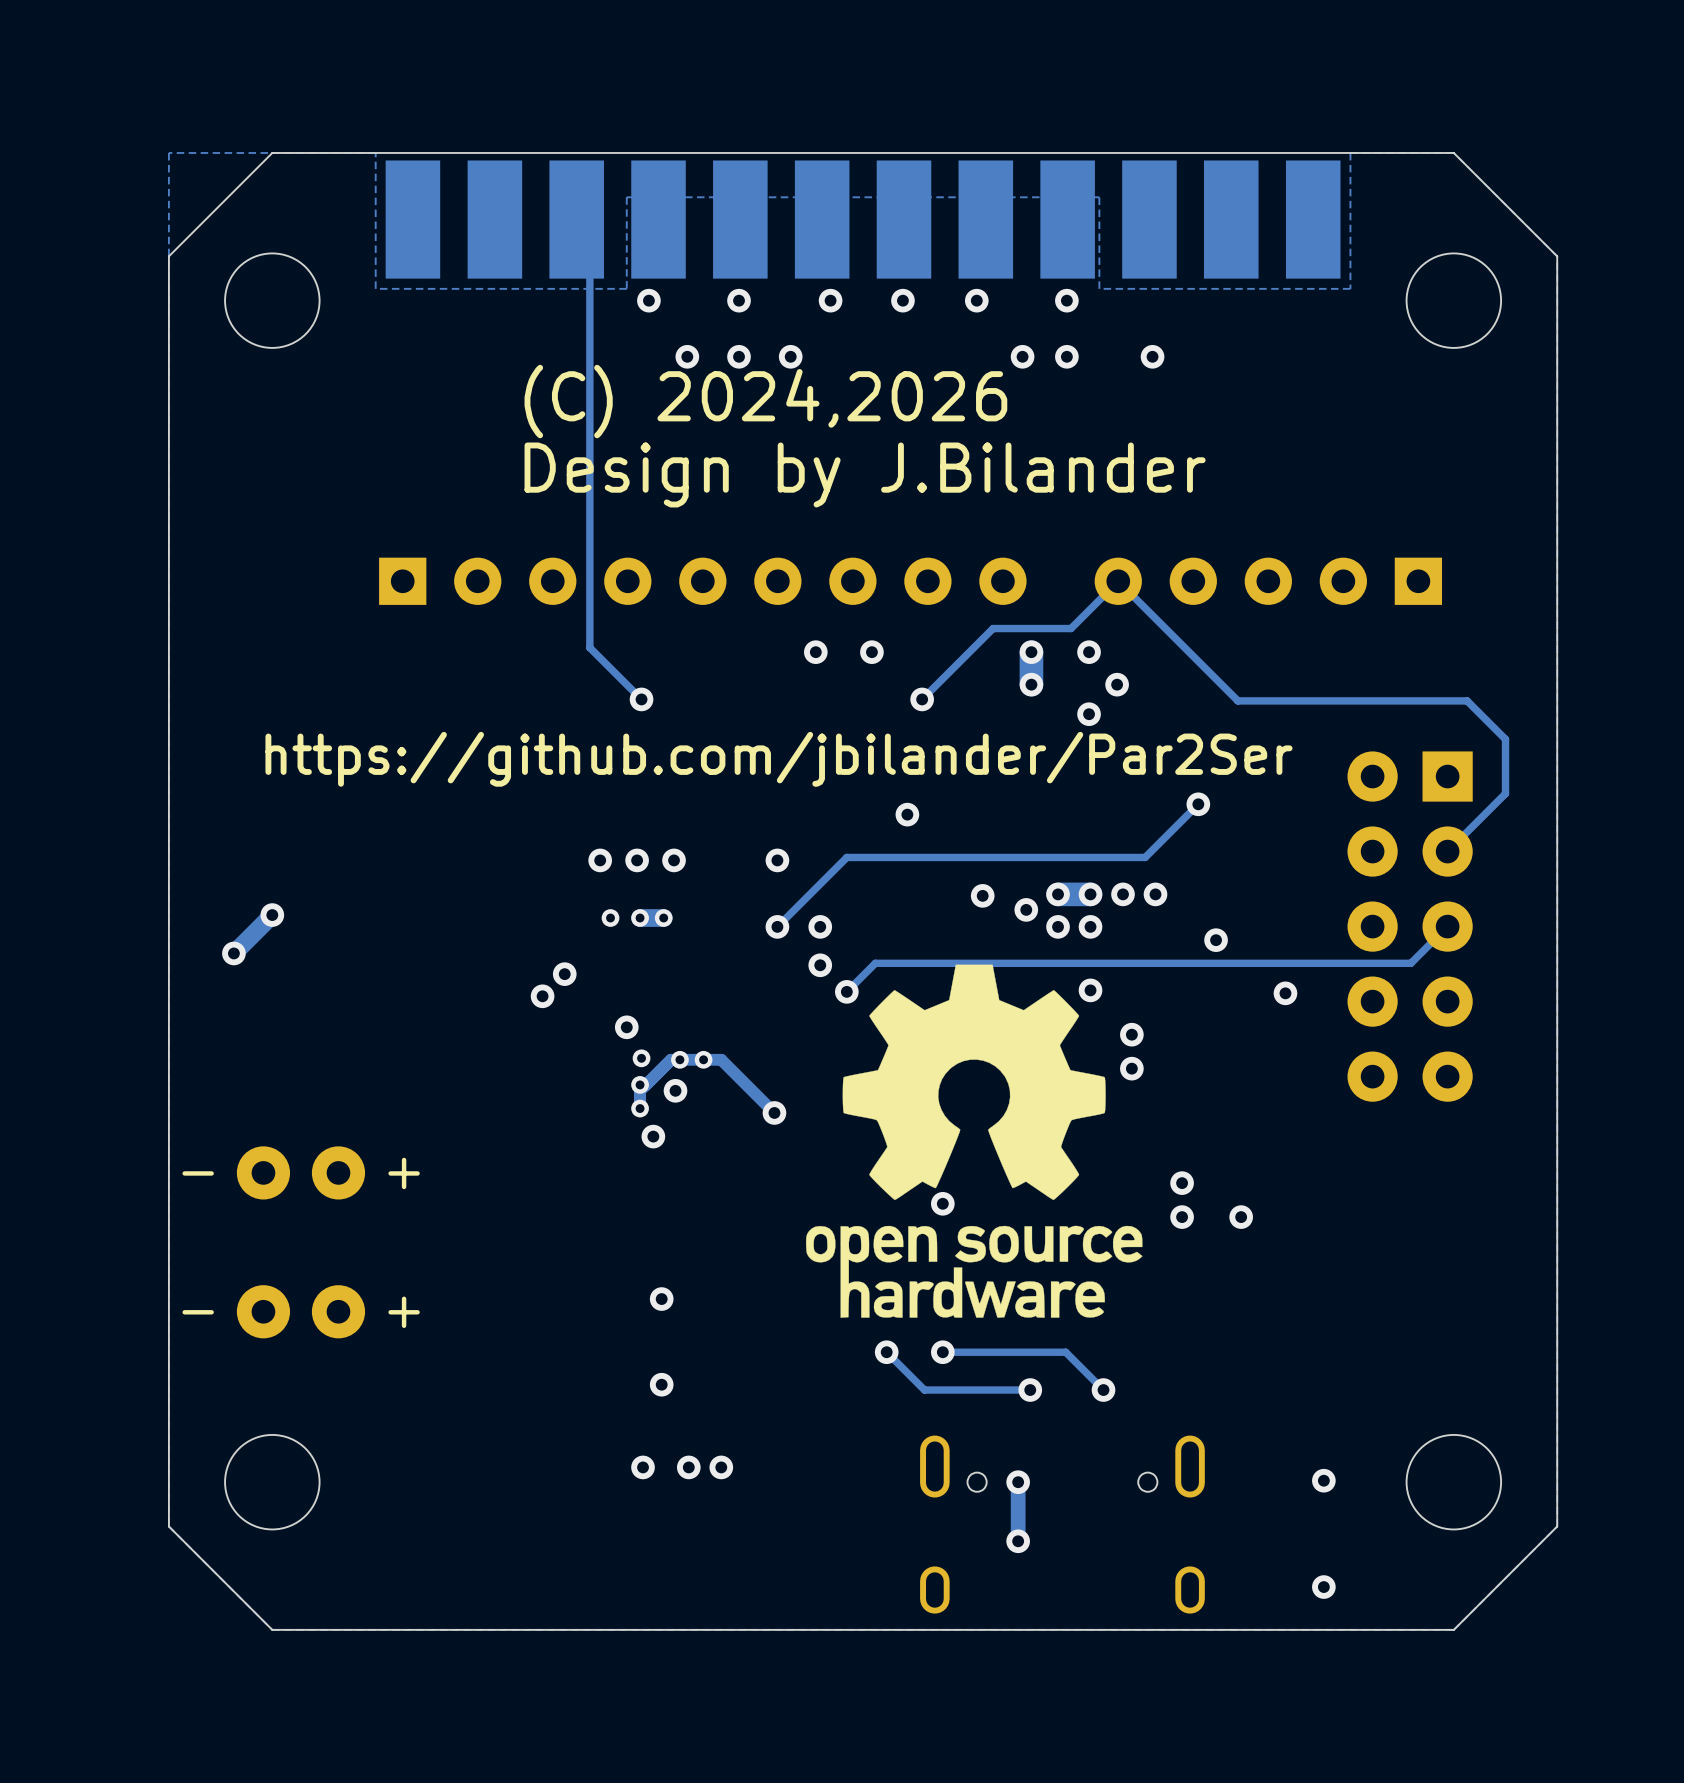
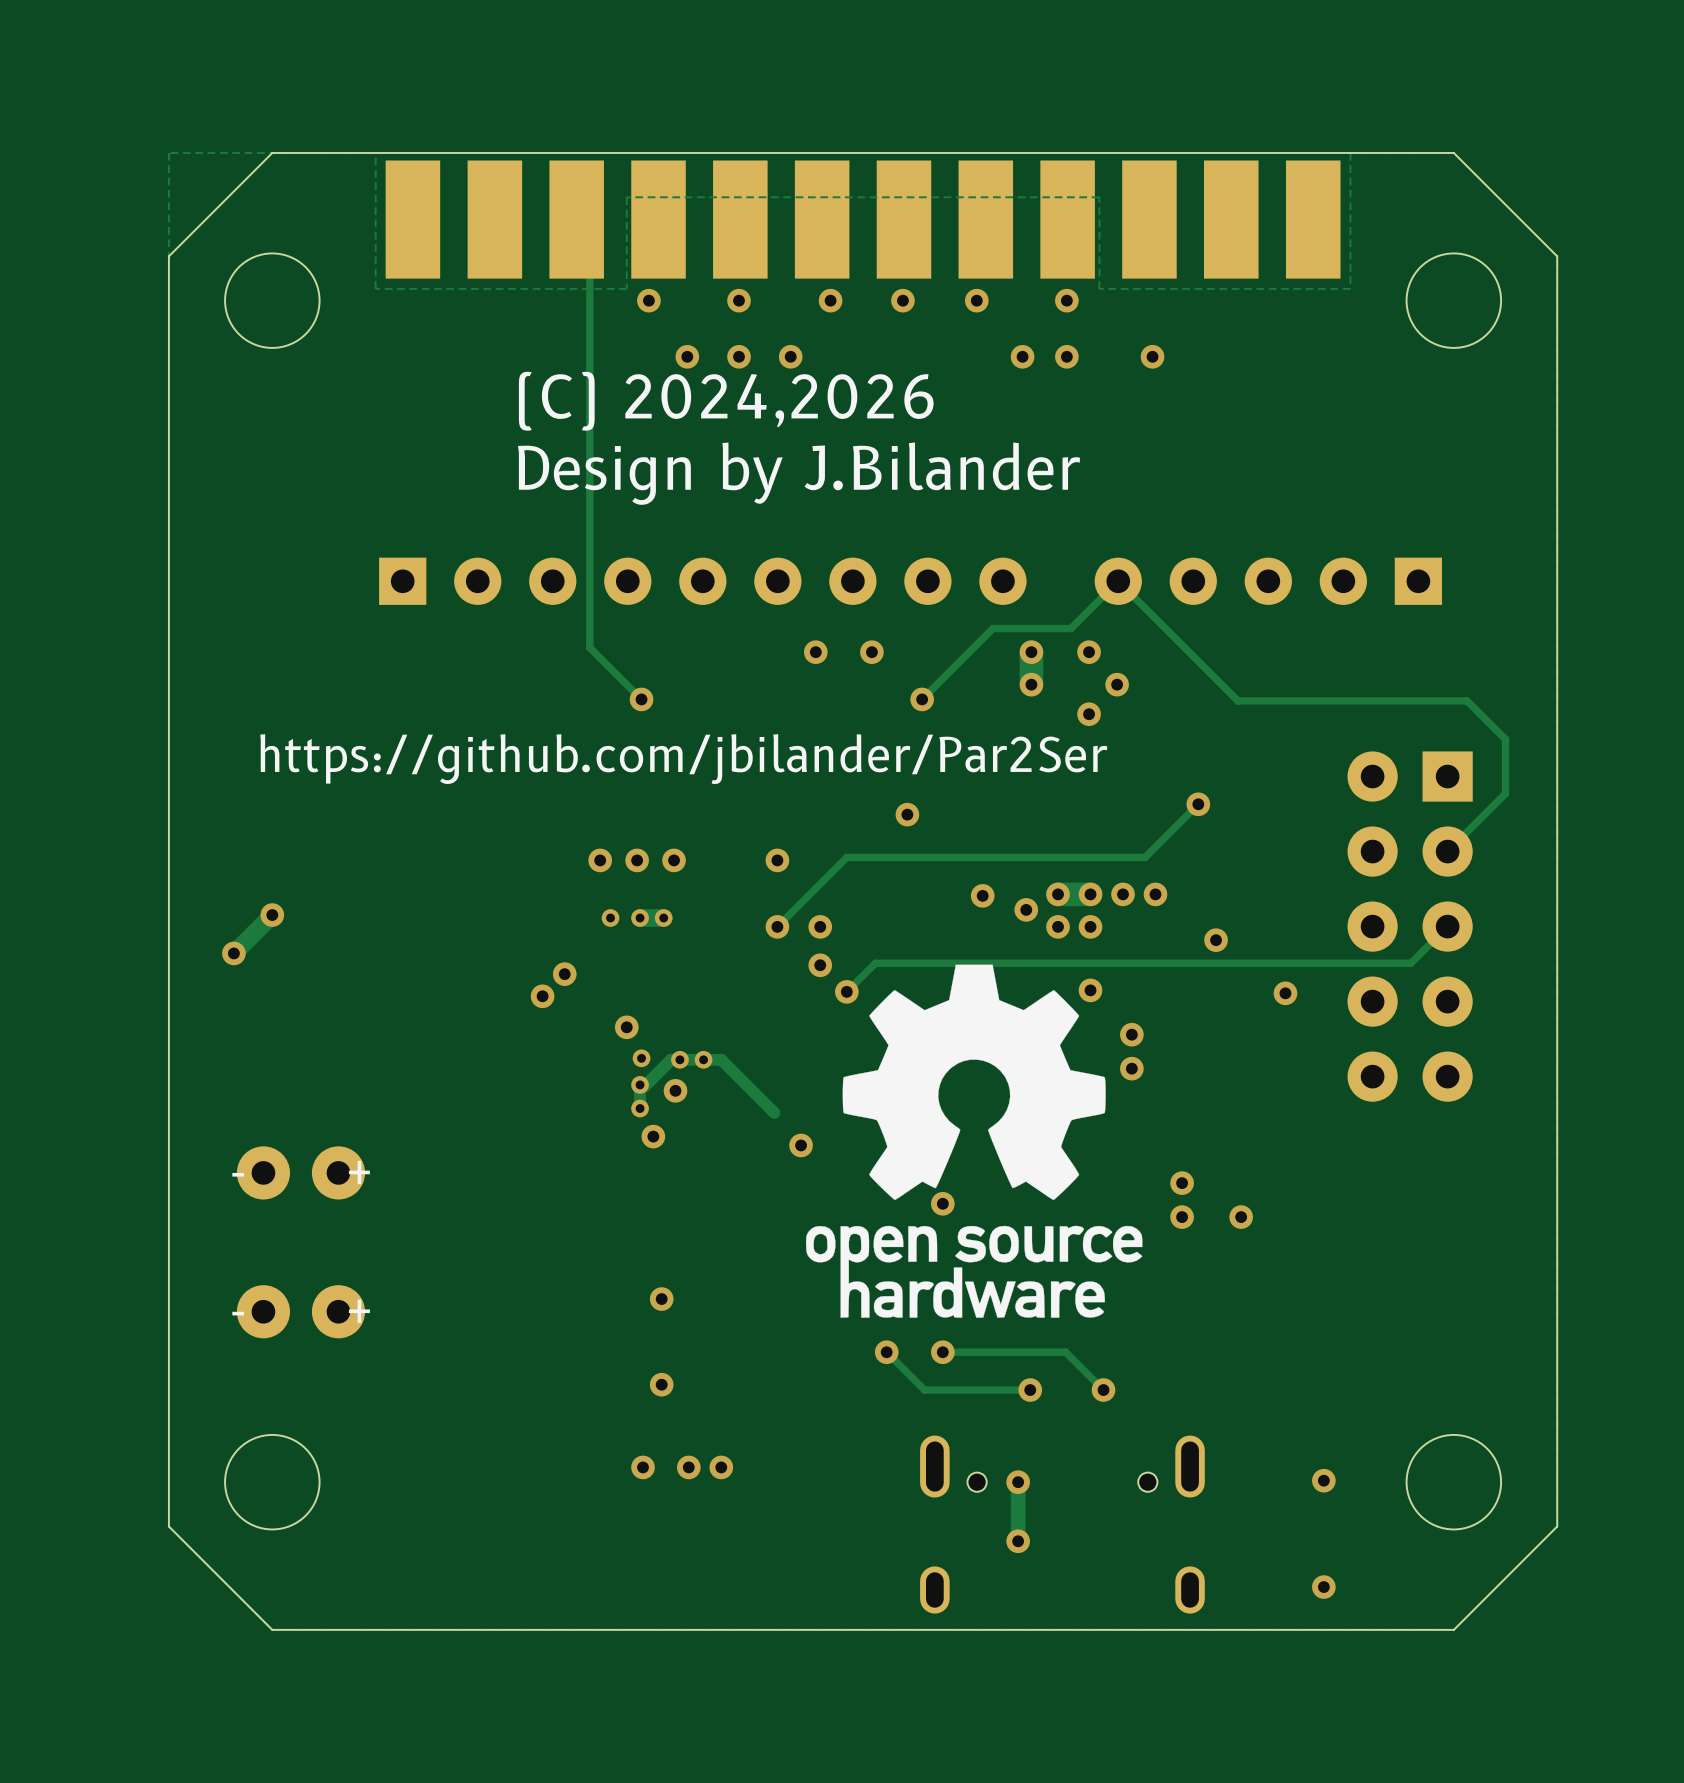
via position: (774, 1112) -> (801, 1145)

